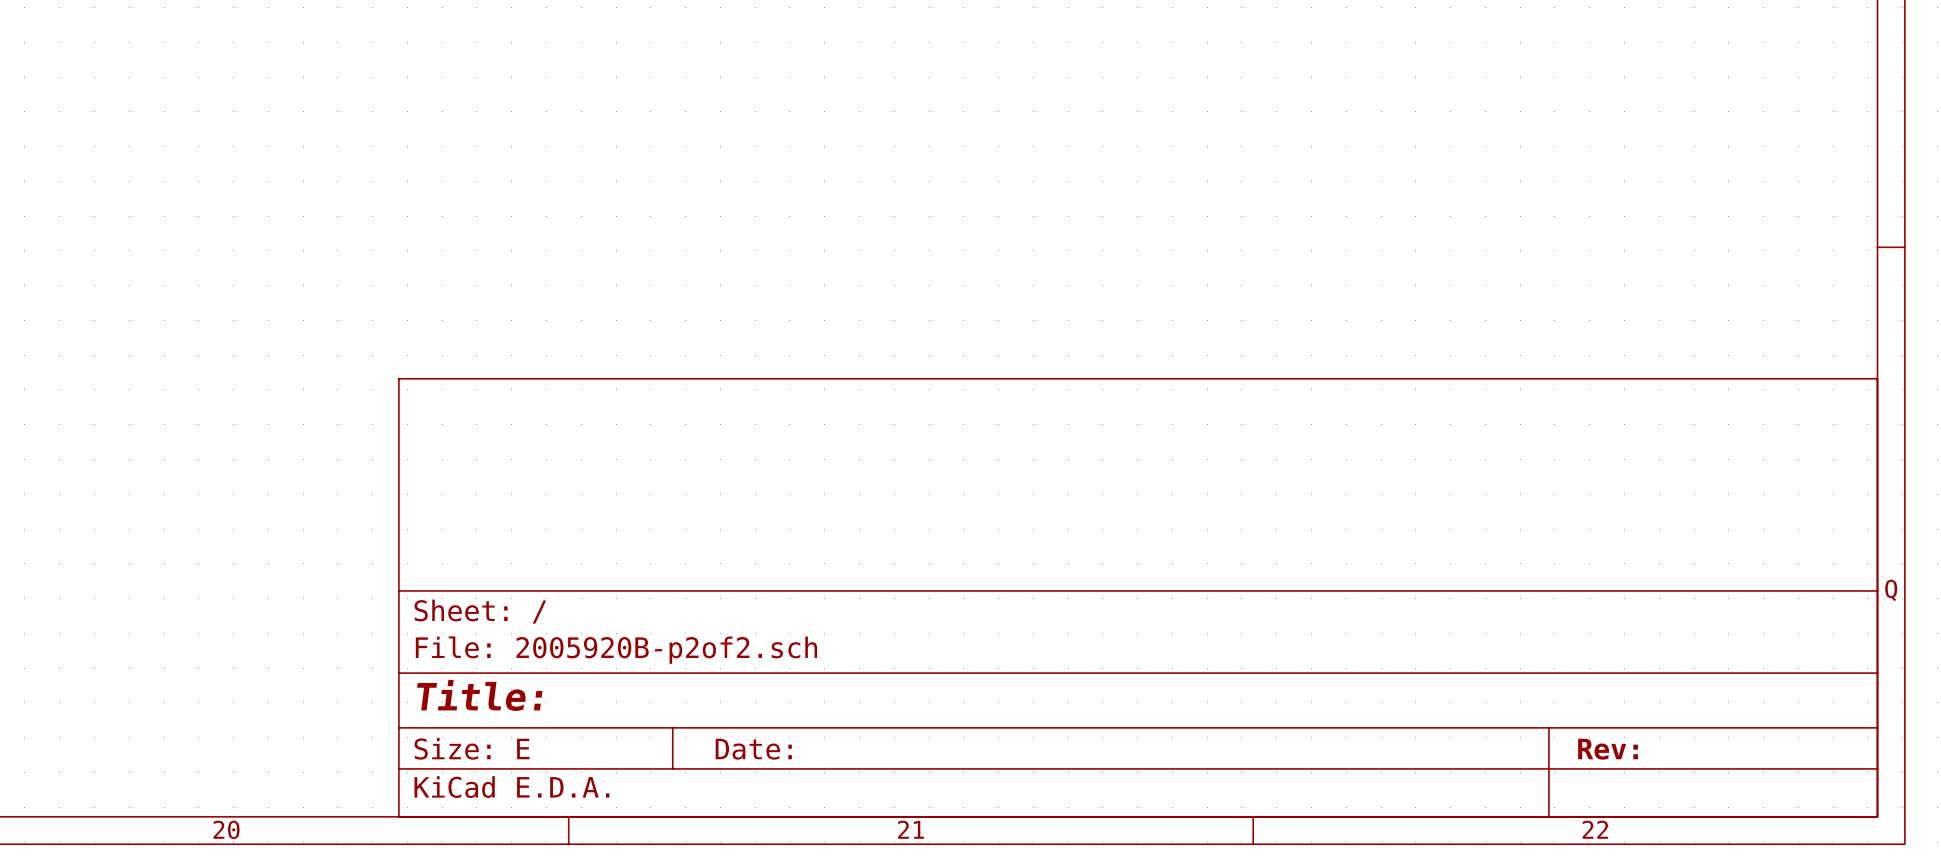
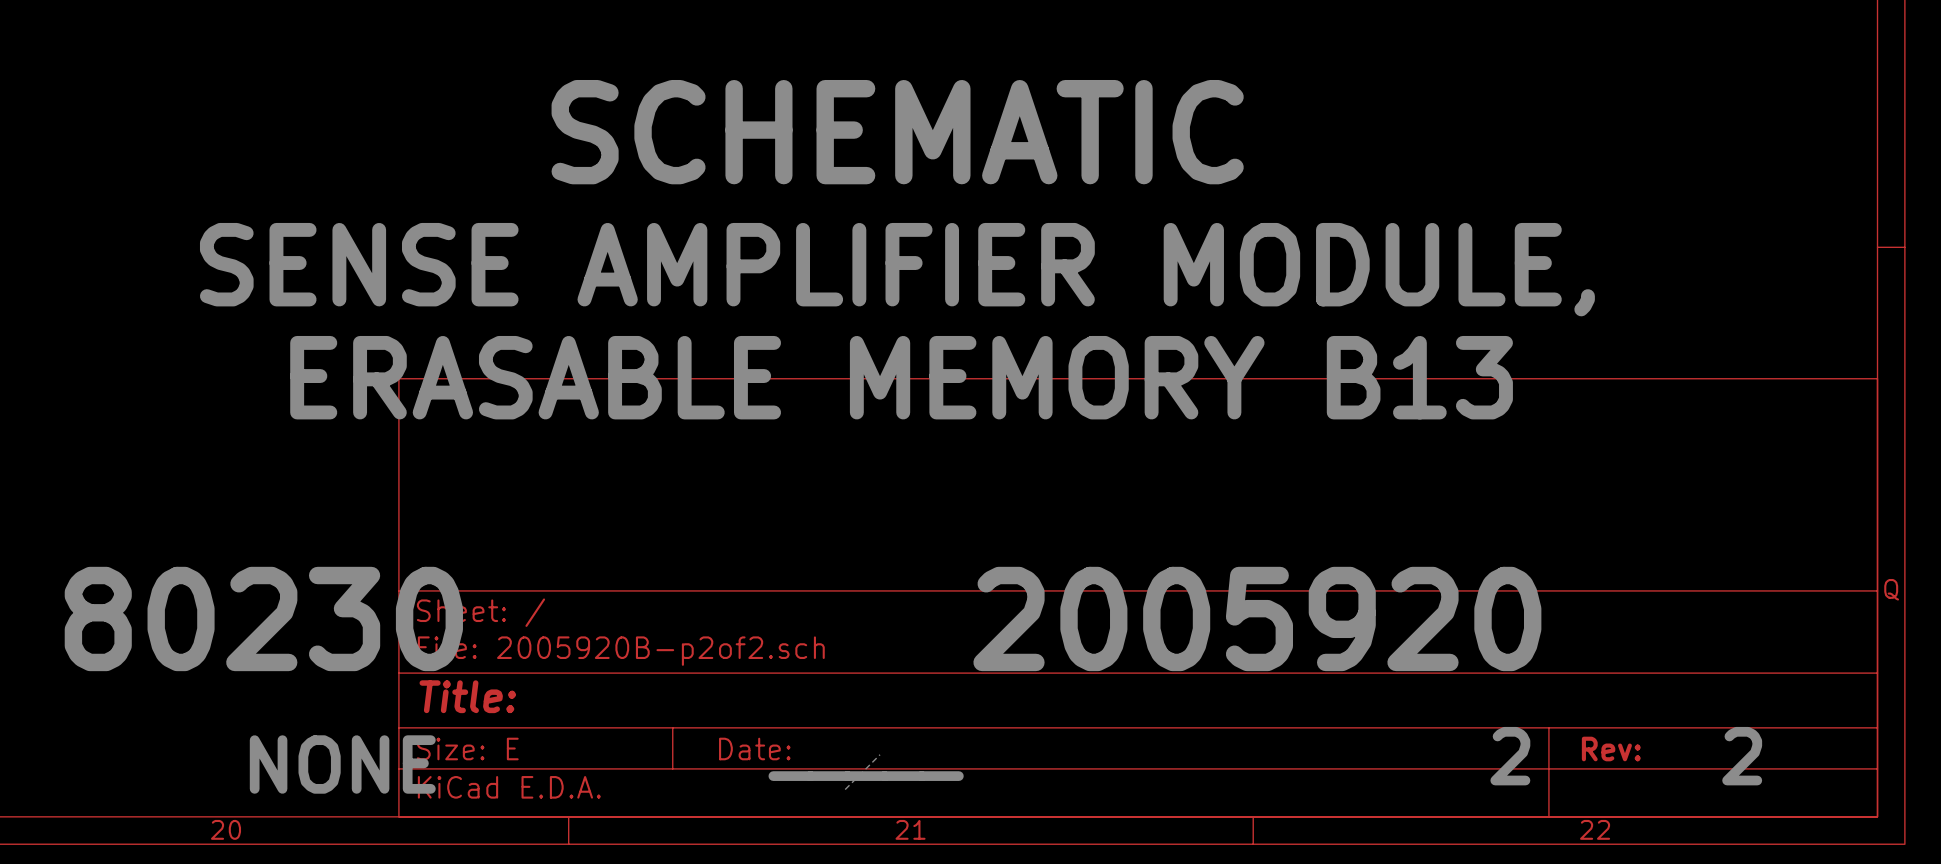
text: none -> SCHEMATIC (897, 132)
text: none -> SENSE AMPLIFIER MODULE, (897, 269)
text: none -> ERASABLE MEMORY B13 (901, 377)
text: none -> 80230 (263, 618)
text: none -> 2005920 (1257, 618)
line: none -> (880, 754) (845, 789)
text: none -> 2 2 (1626, 756)
text: none -> NONE (342, 764)
text: none -> _____ (866, 776)

